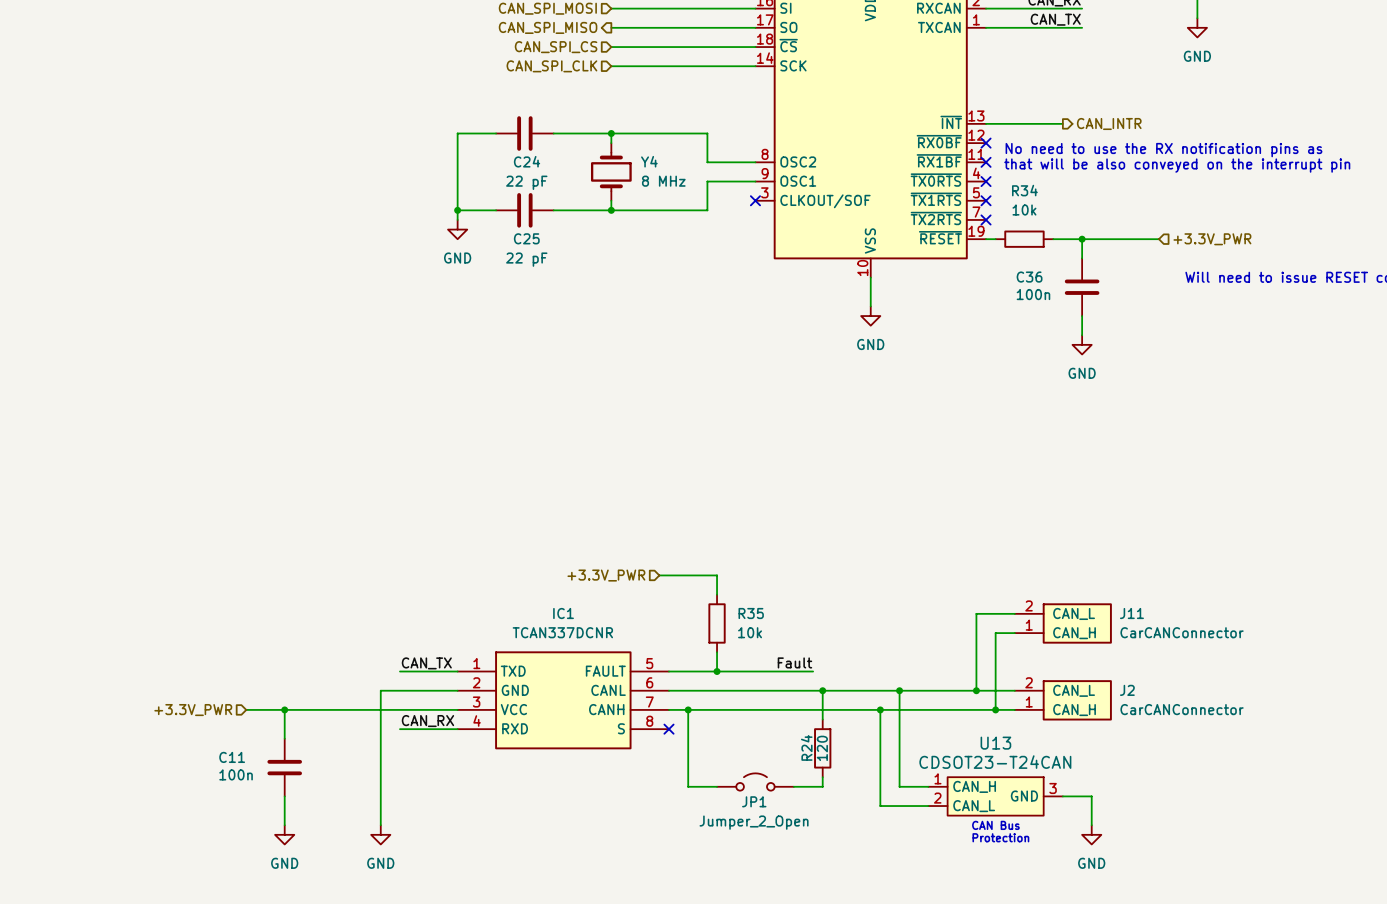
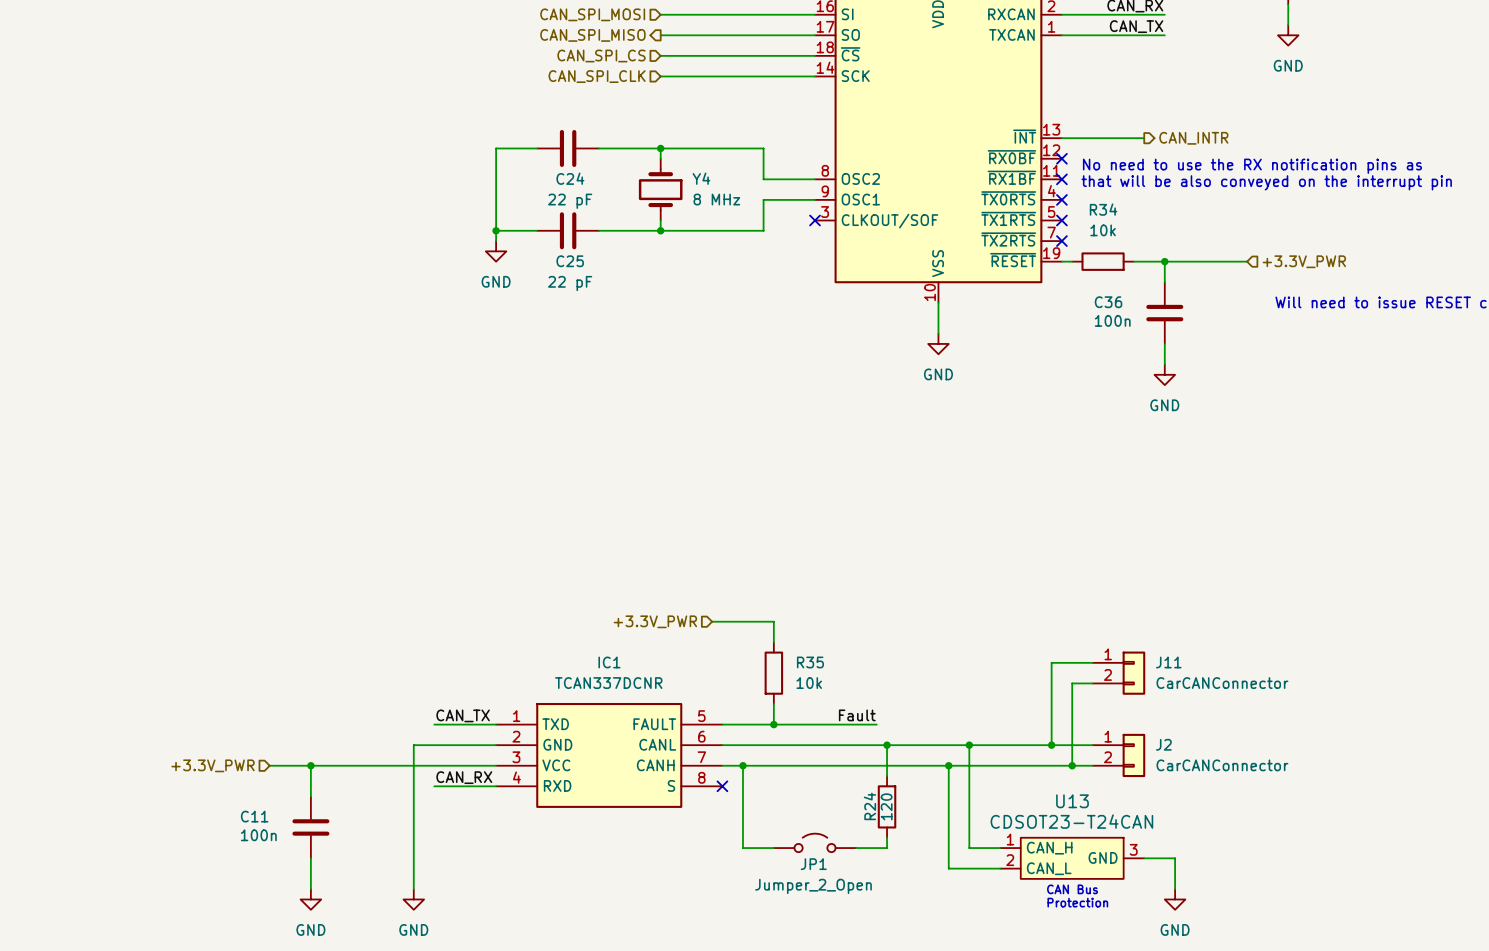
J11 symbol: [1014, 603, 1112, 644] -> [1092, 651, 1146, 695]
J11 name position: J11 (1131, 613) -> J11 (1168, 662)
J11 value position: CarCANConnector (1182, 632) -> CarCANConnector (1222, 683)
J2 symbol: [1014, 680, 1112, 721] -> [1092, 733, 1146, 778]
J2 name position: J2 (1127, 690) -> J2 (1163, 744)
J2 value position: CarCANConnector (1182, 709) -> CarCANConnector (1222, 765)

